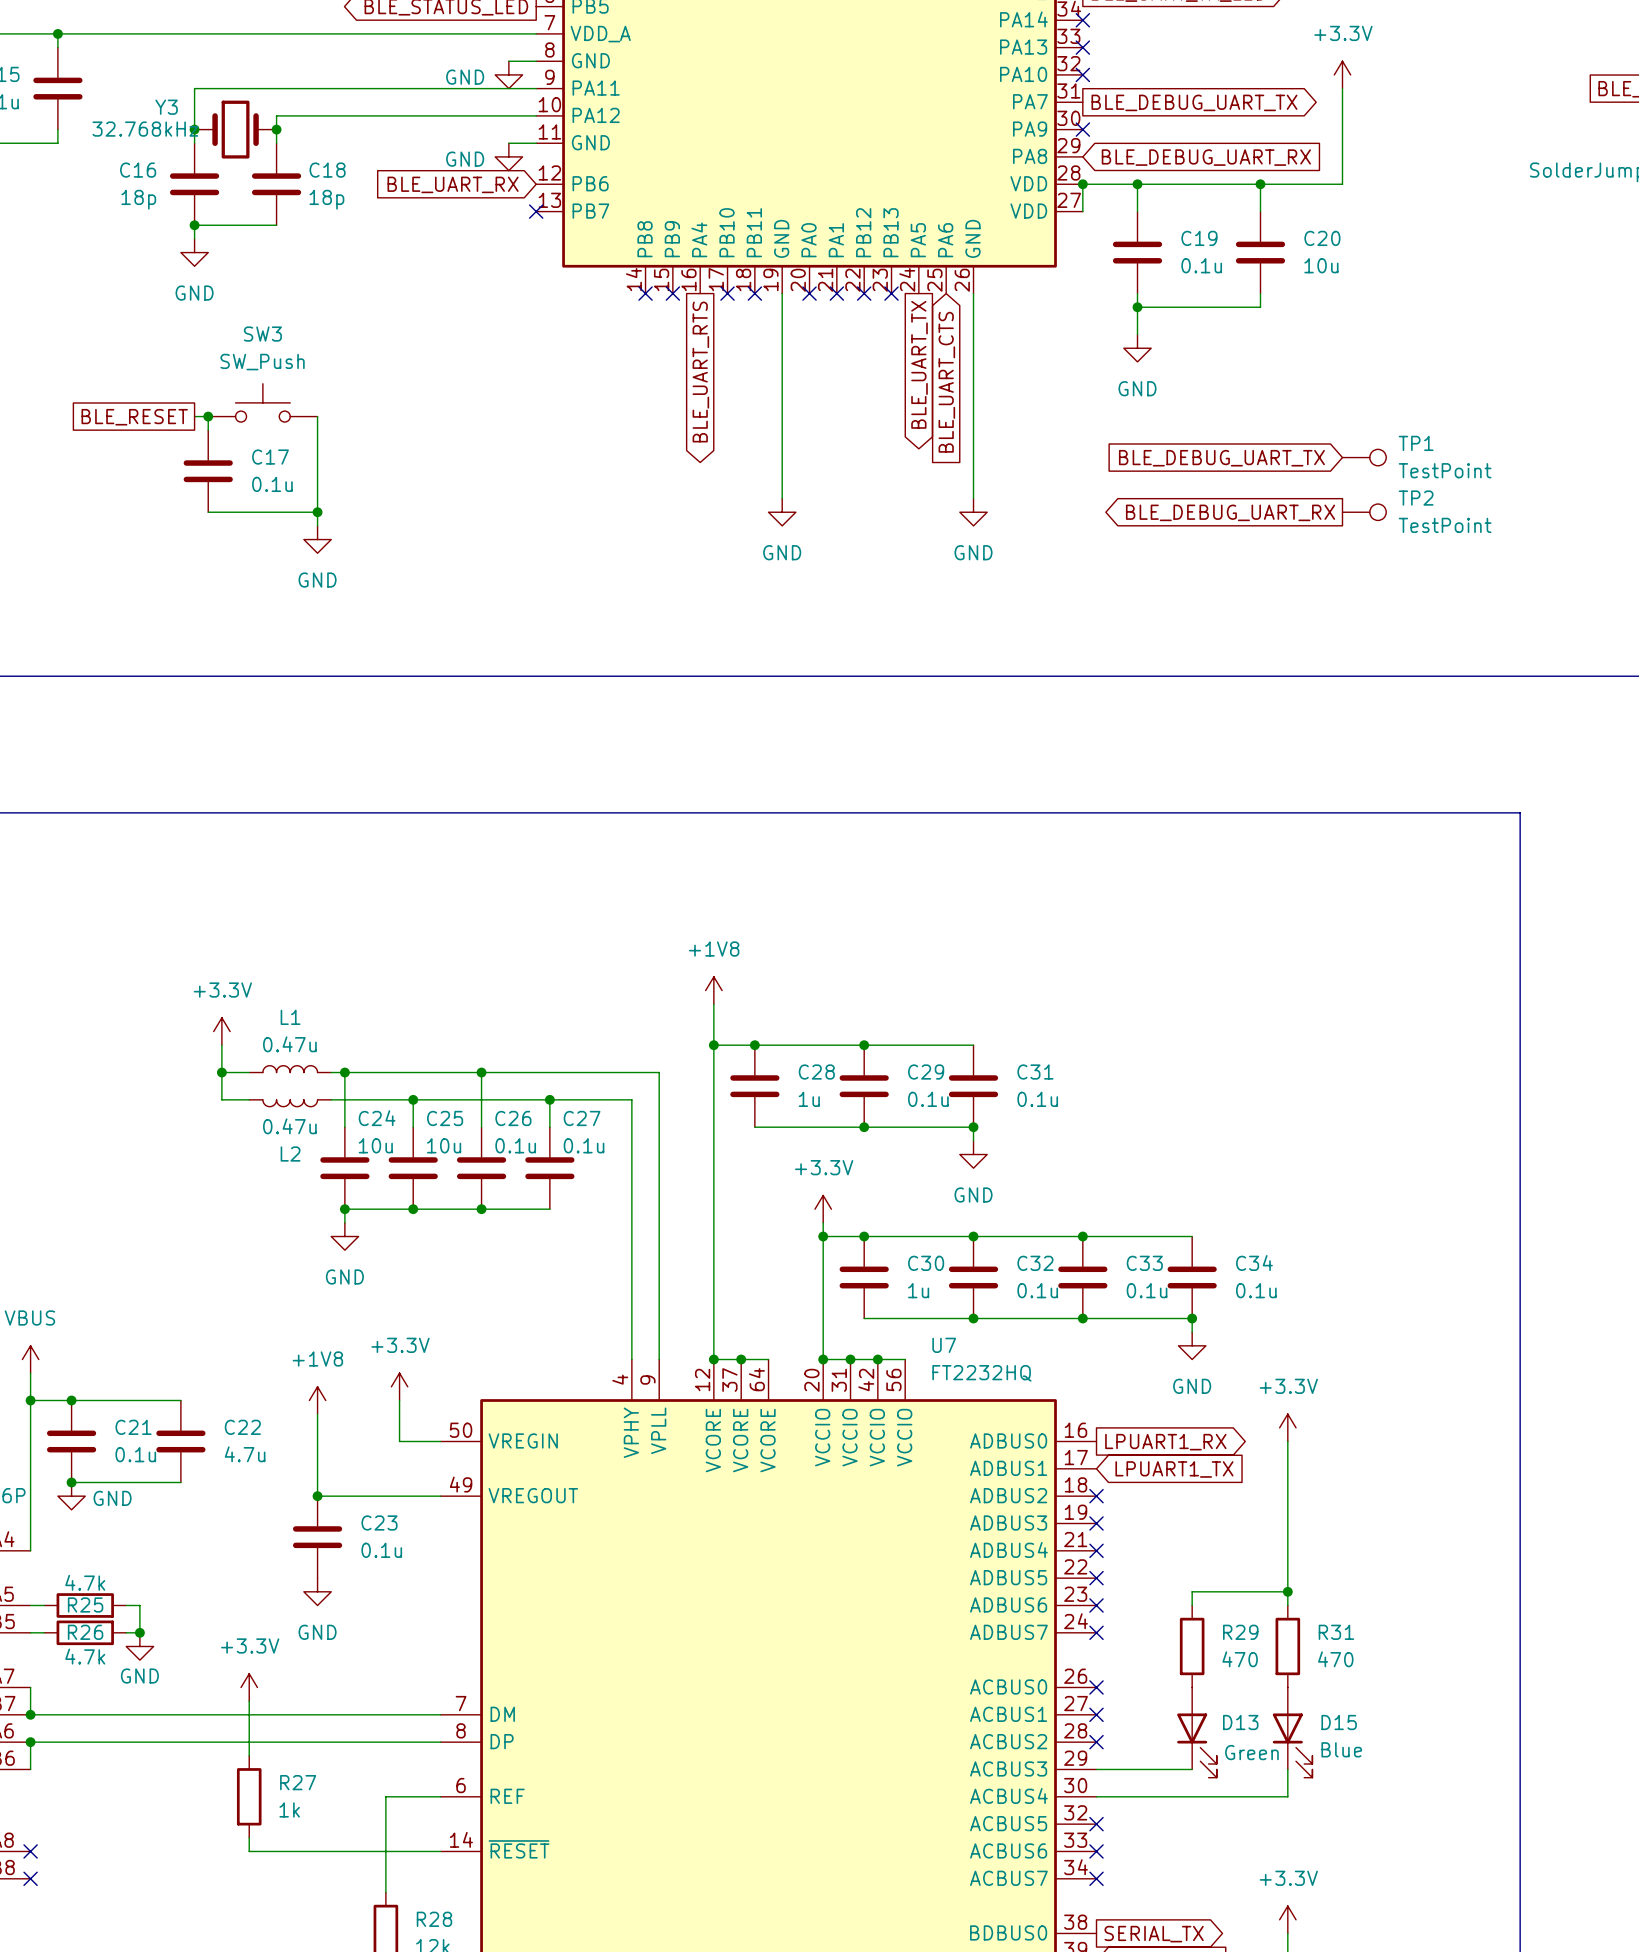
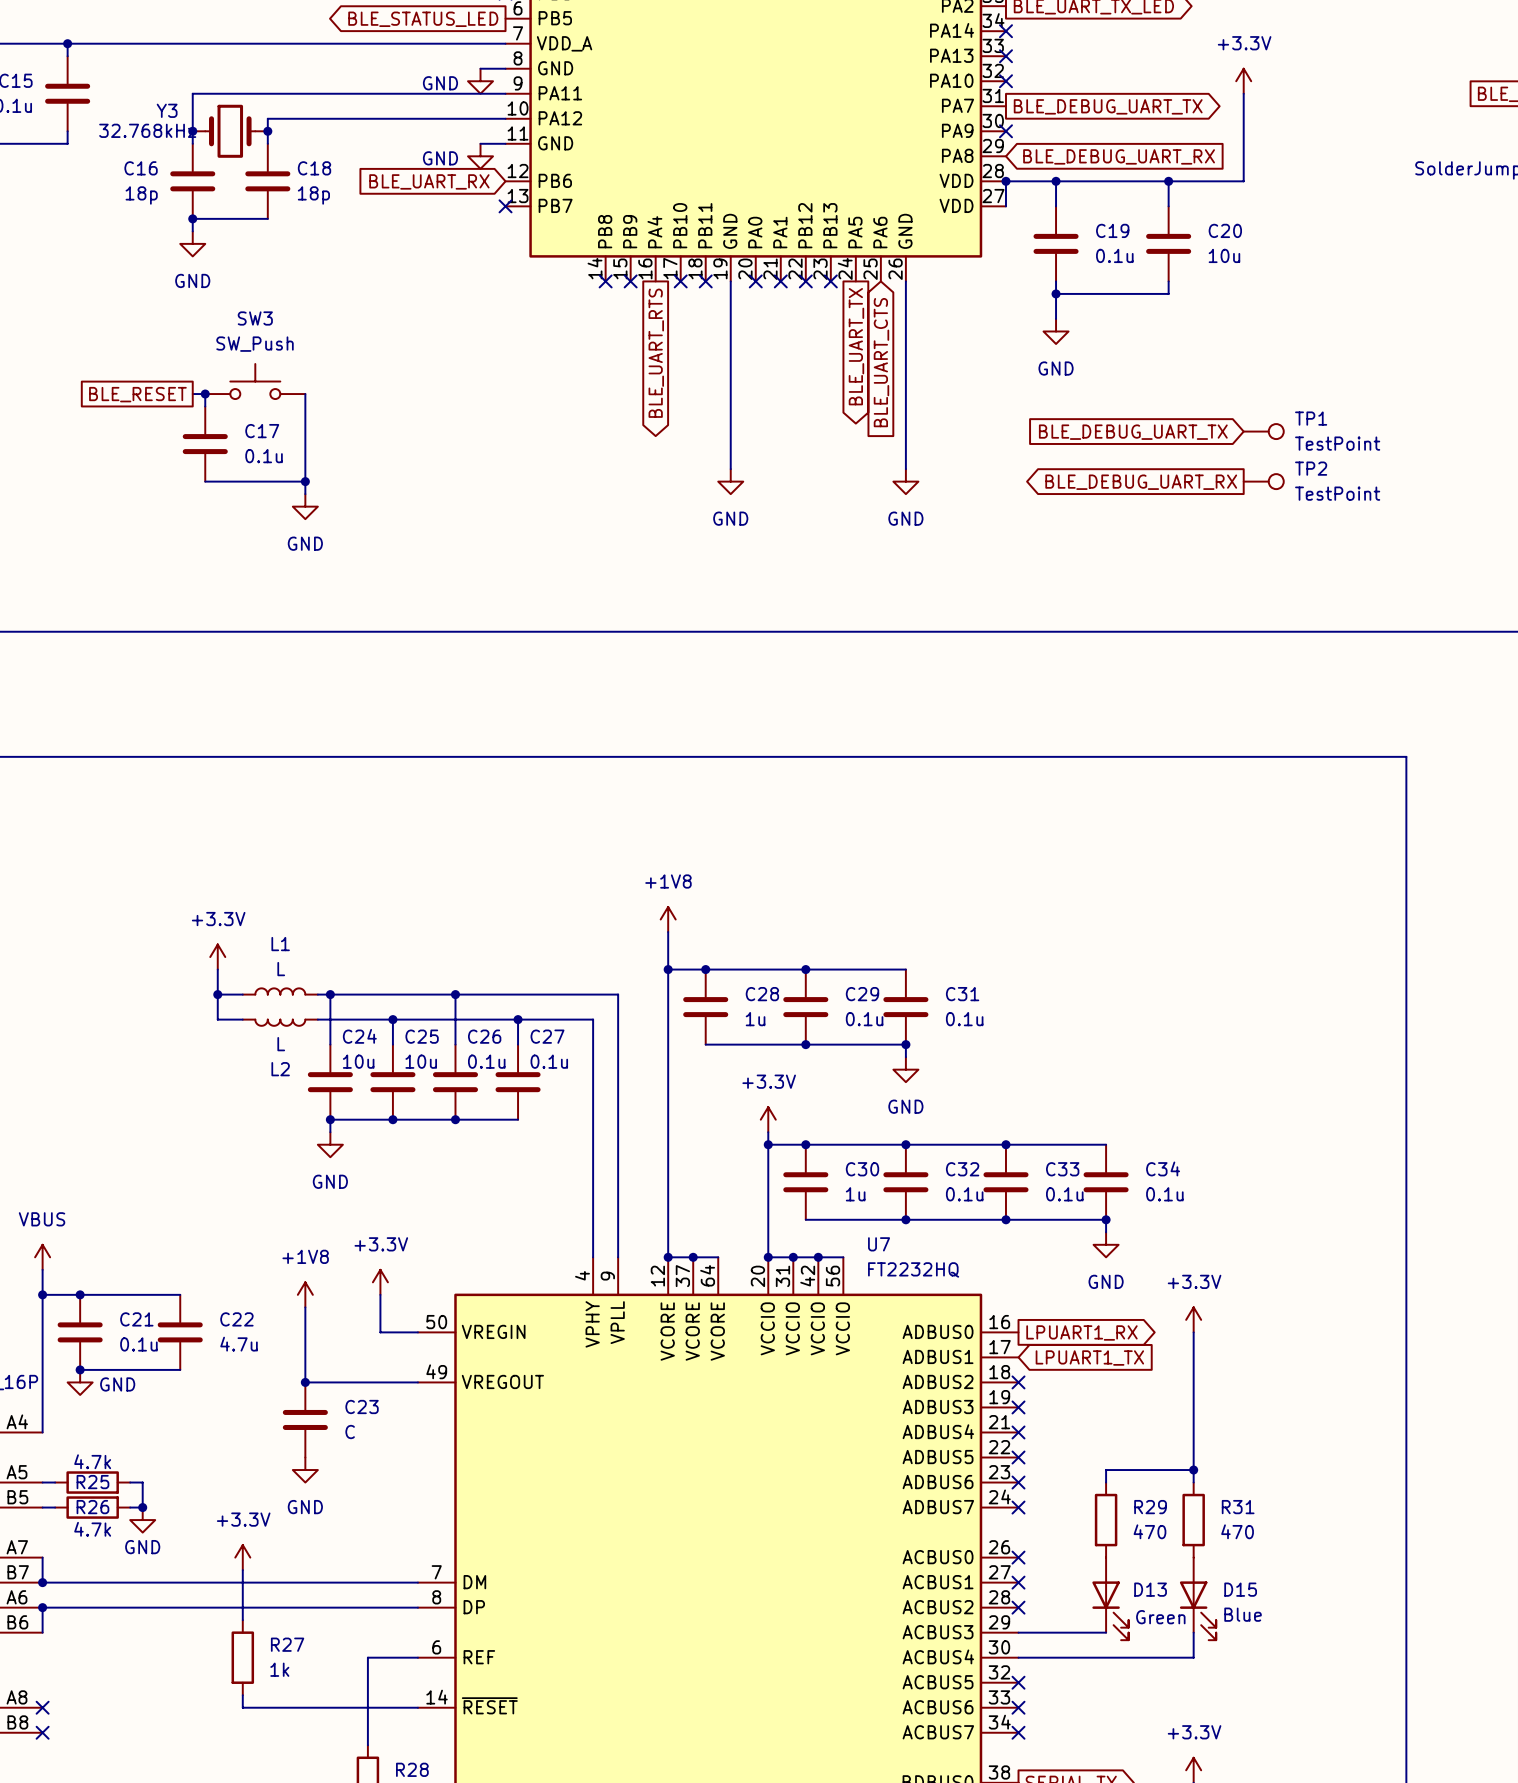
L1 value: 0.47u (289, 1044) -> L (281, 969)
L2 value: 0.47u (289, 1126) -> L (281, 1044)
C23 value: 0.1u (381, 1550) -> C (350, 1432)

